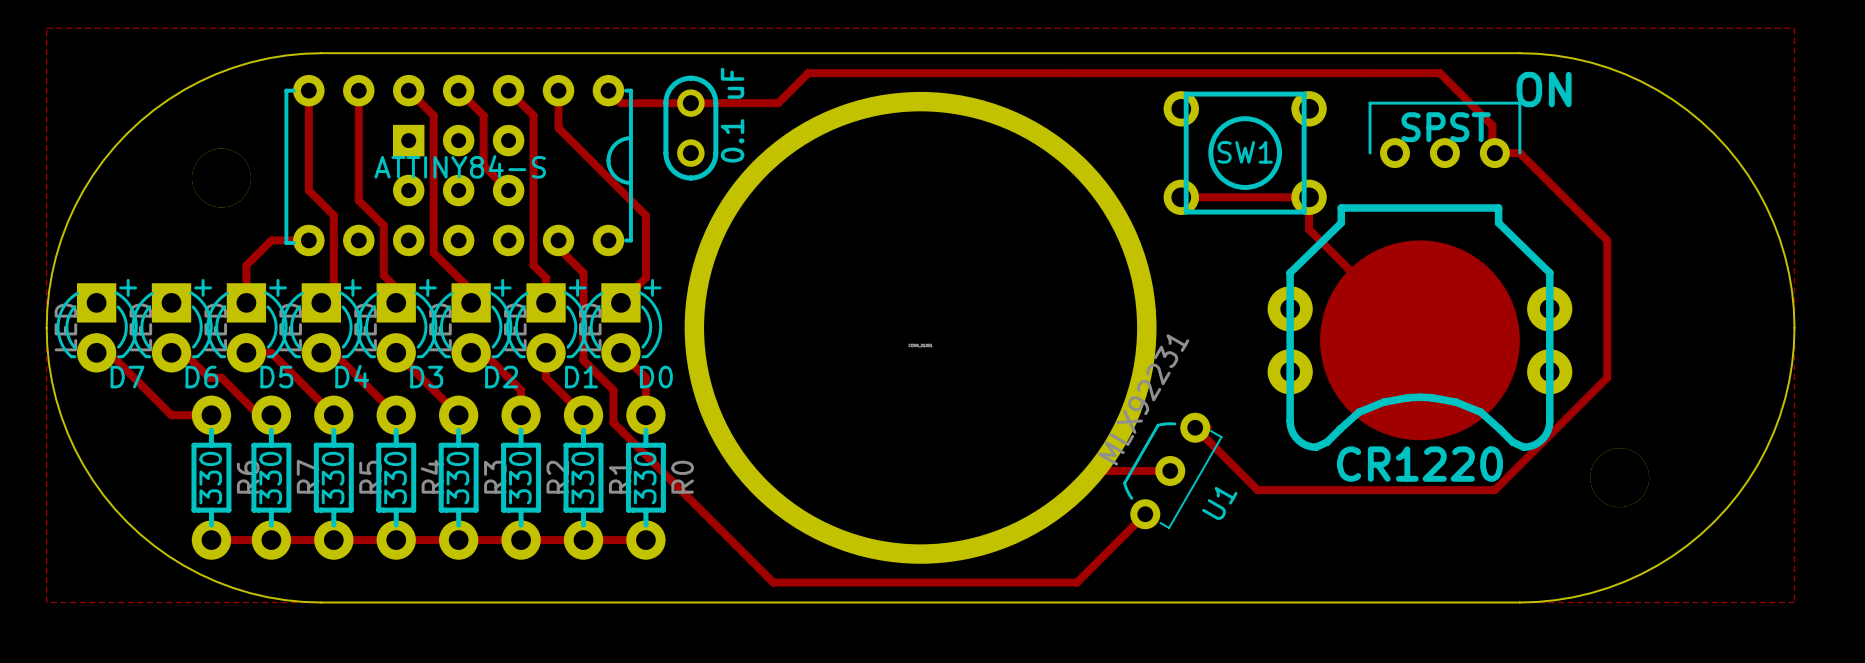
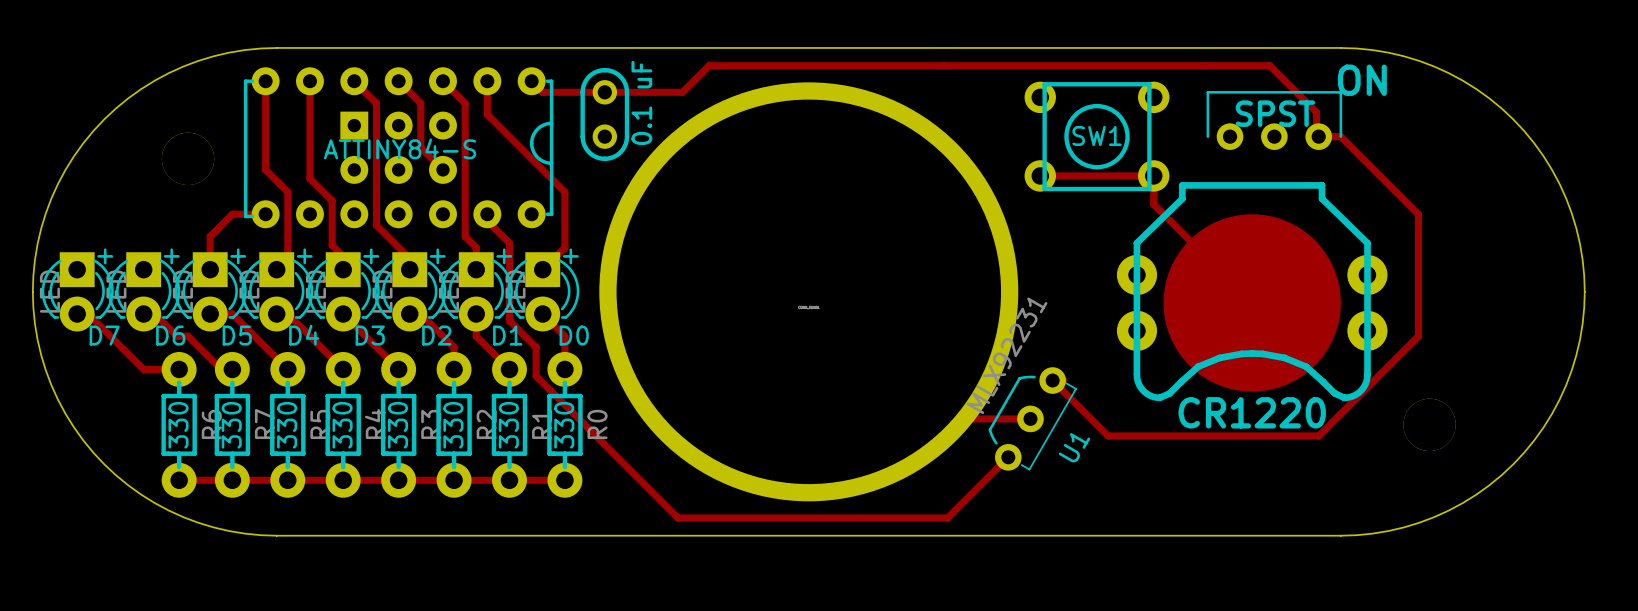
zone outline: (46, 28) (46, 602) (1794, 602) (1794, 28) (46, 28) -> none

